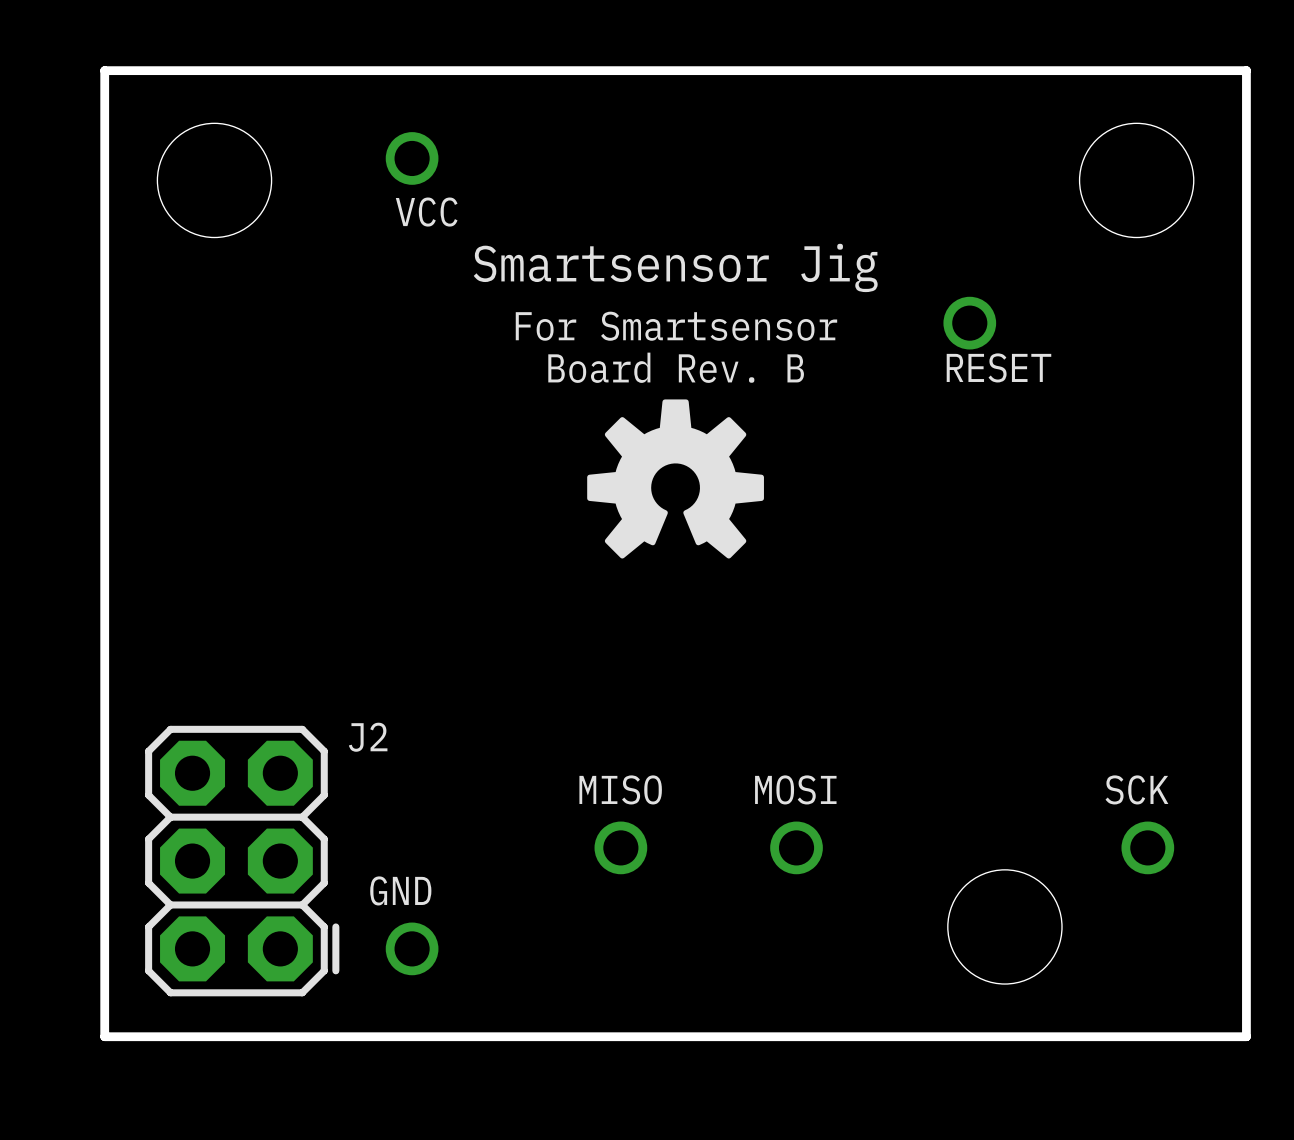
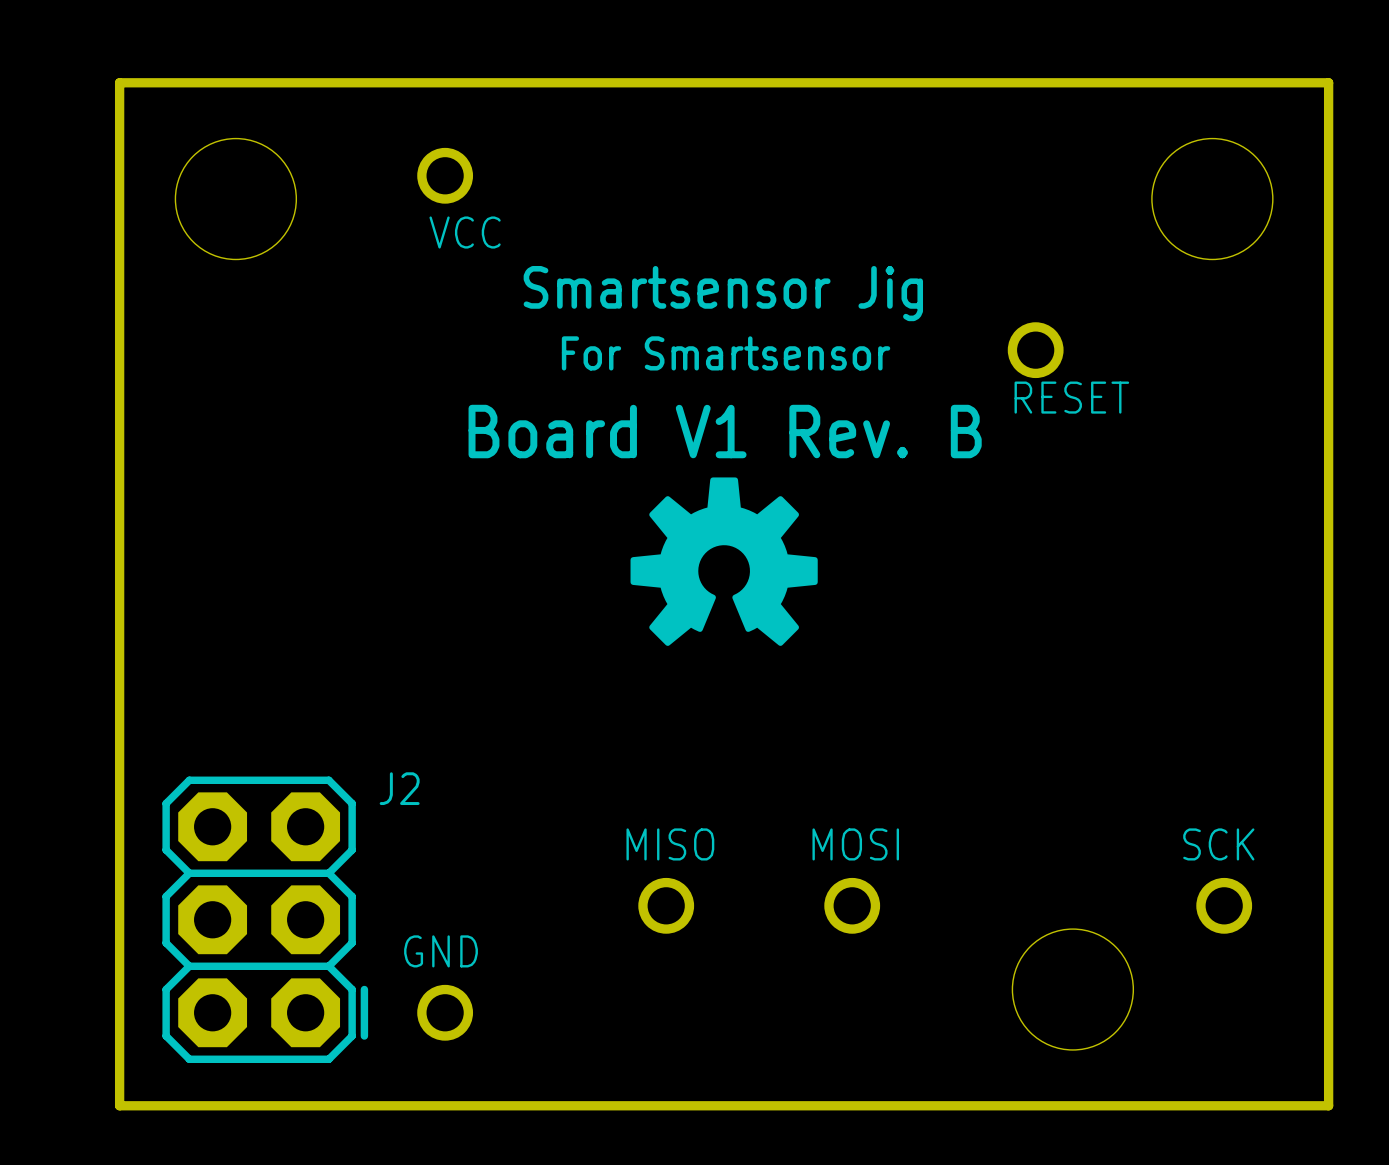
text: Board Rev. B (676, 367) -> Board V1 Rev. B (725, 431)
drawing position: (675, 478) -> (724, 561)

